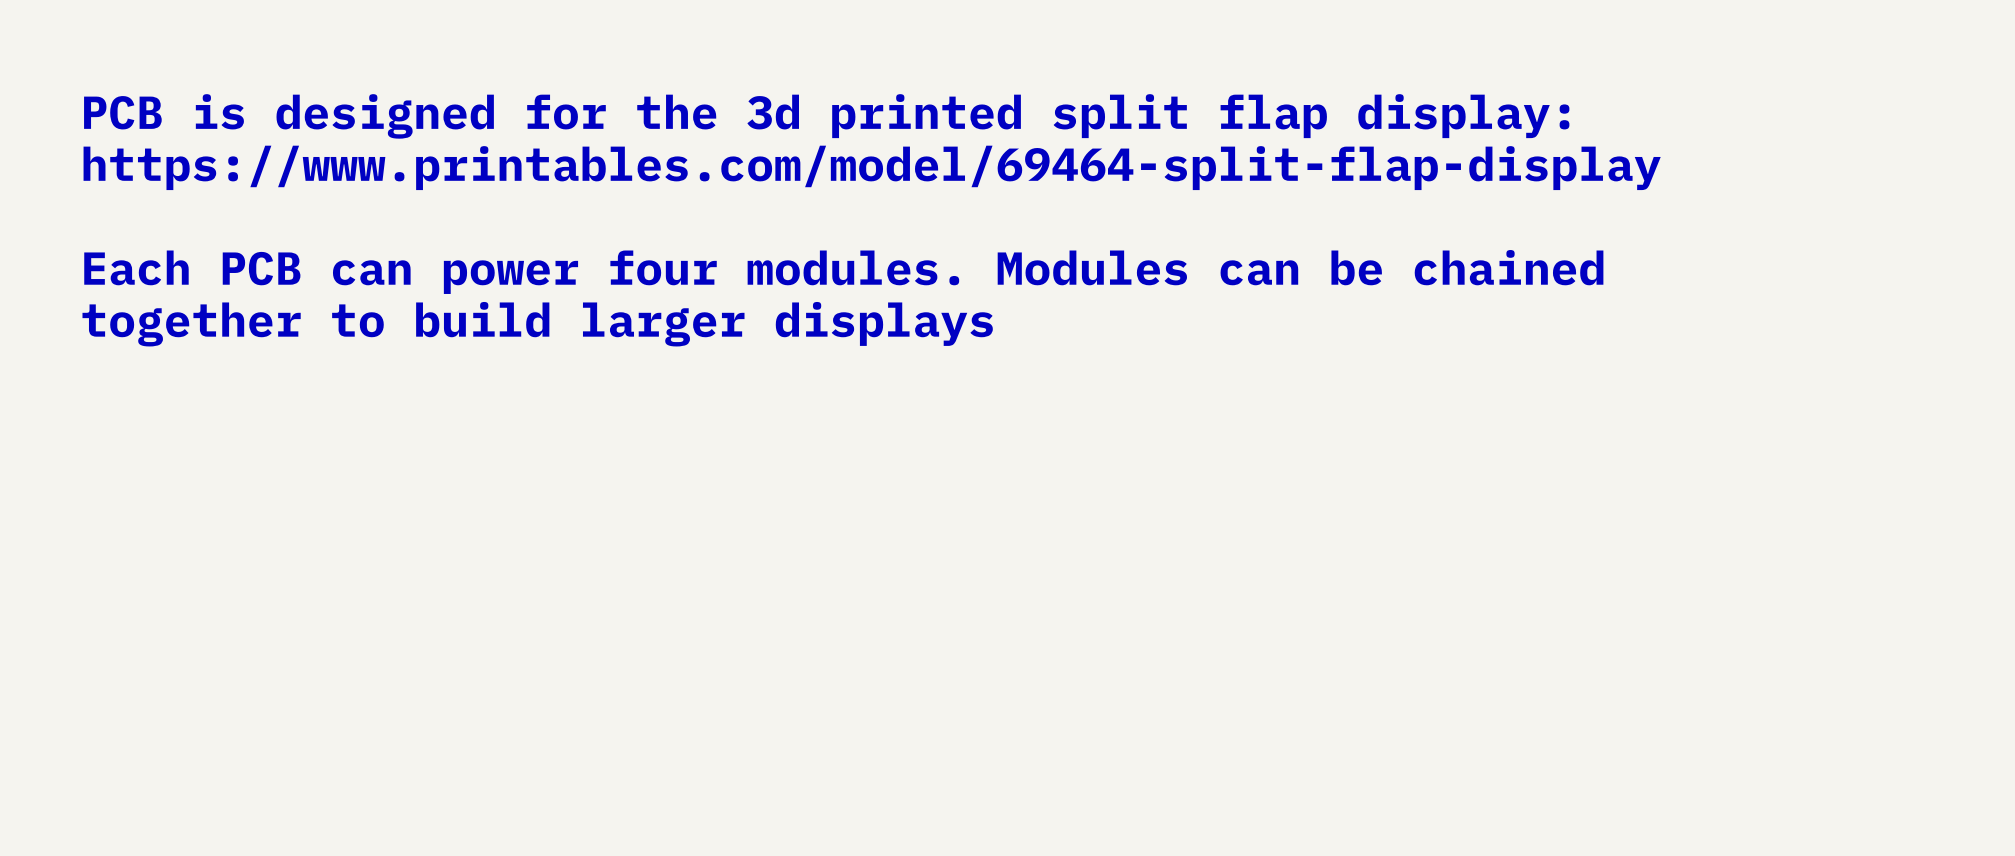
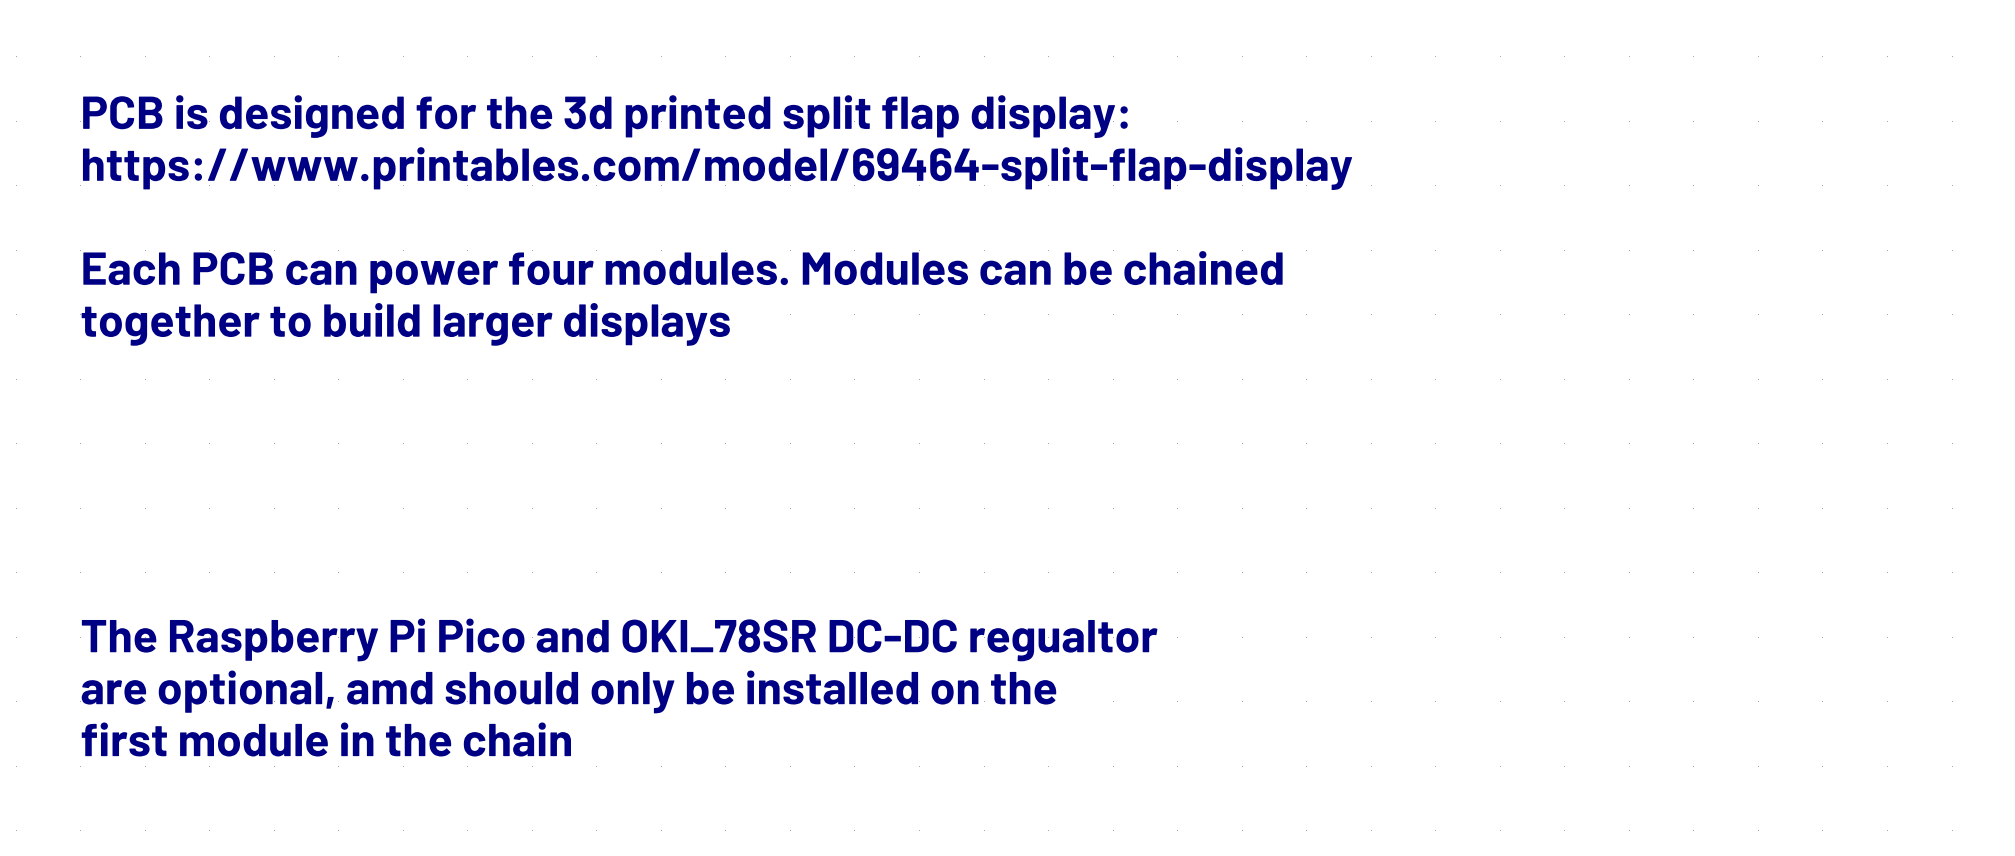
text: none -> The Raspberry Pi Pico and OKI_78SR DC-DC regualtor (619, 640)
text: none -> are optional, amd should only be installed on the (568, 691)
text: none -> first module in the chain (326, 739)

